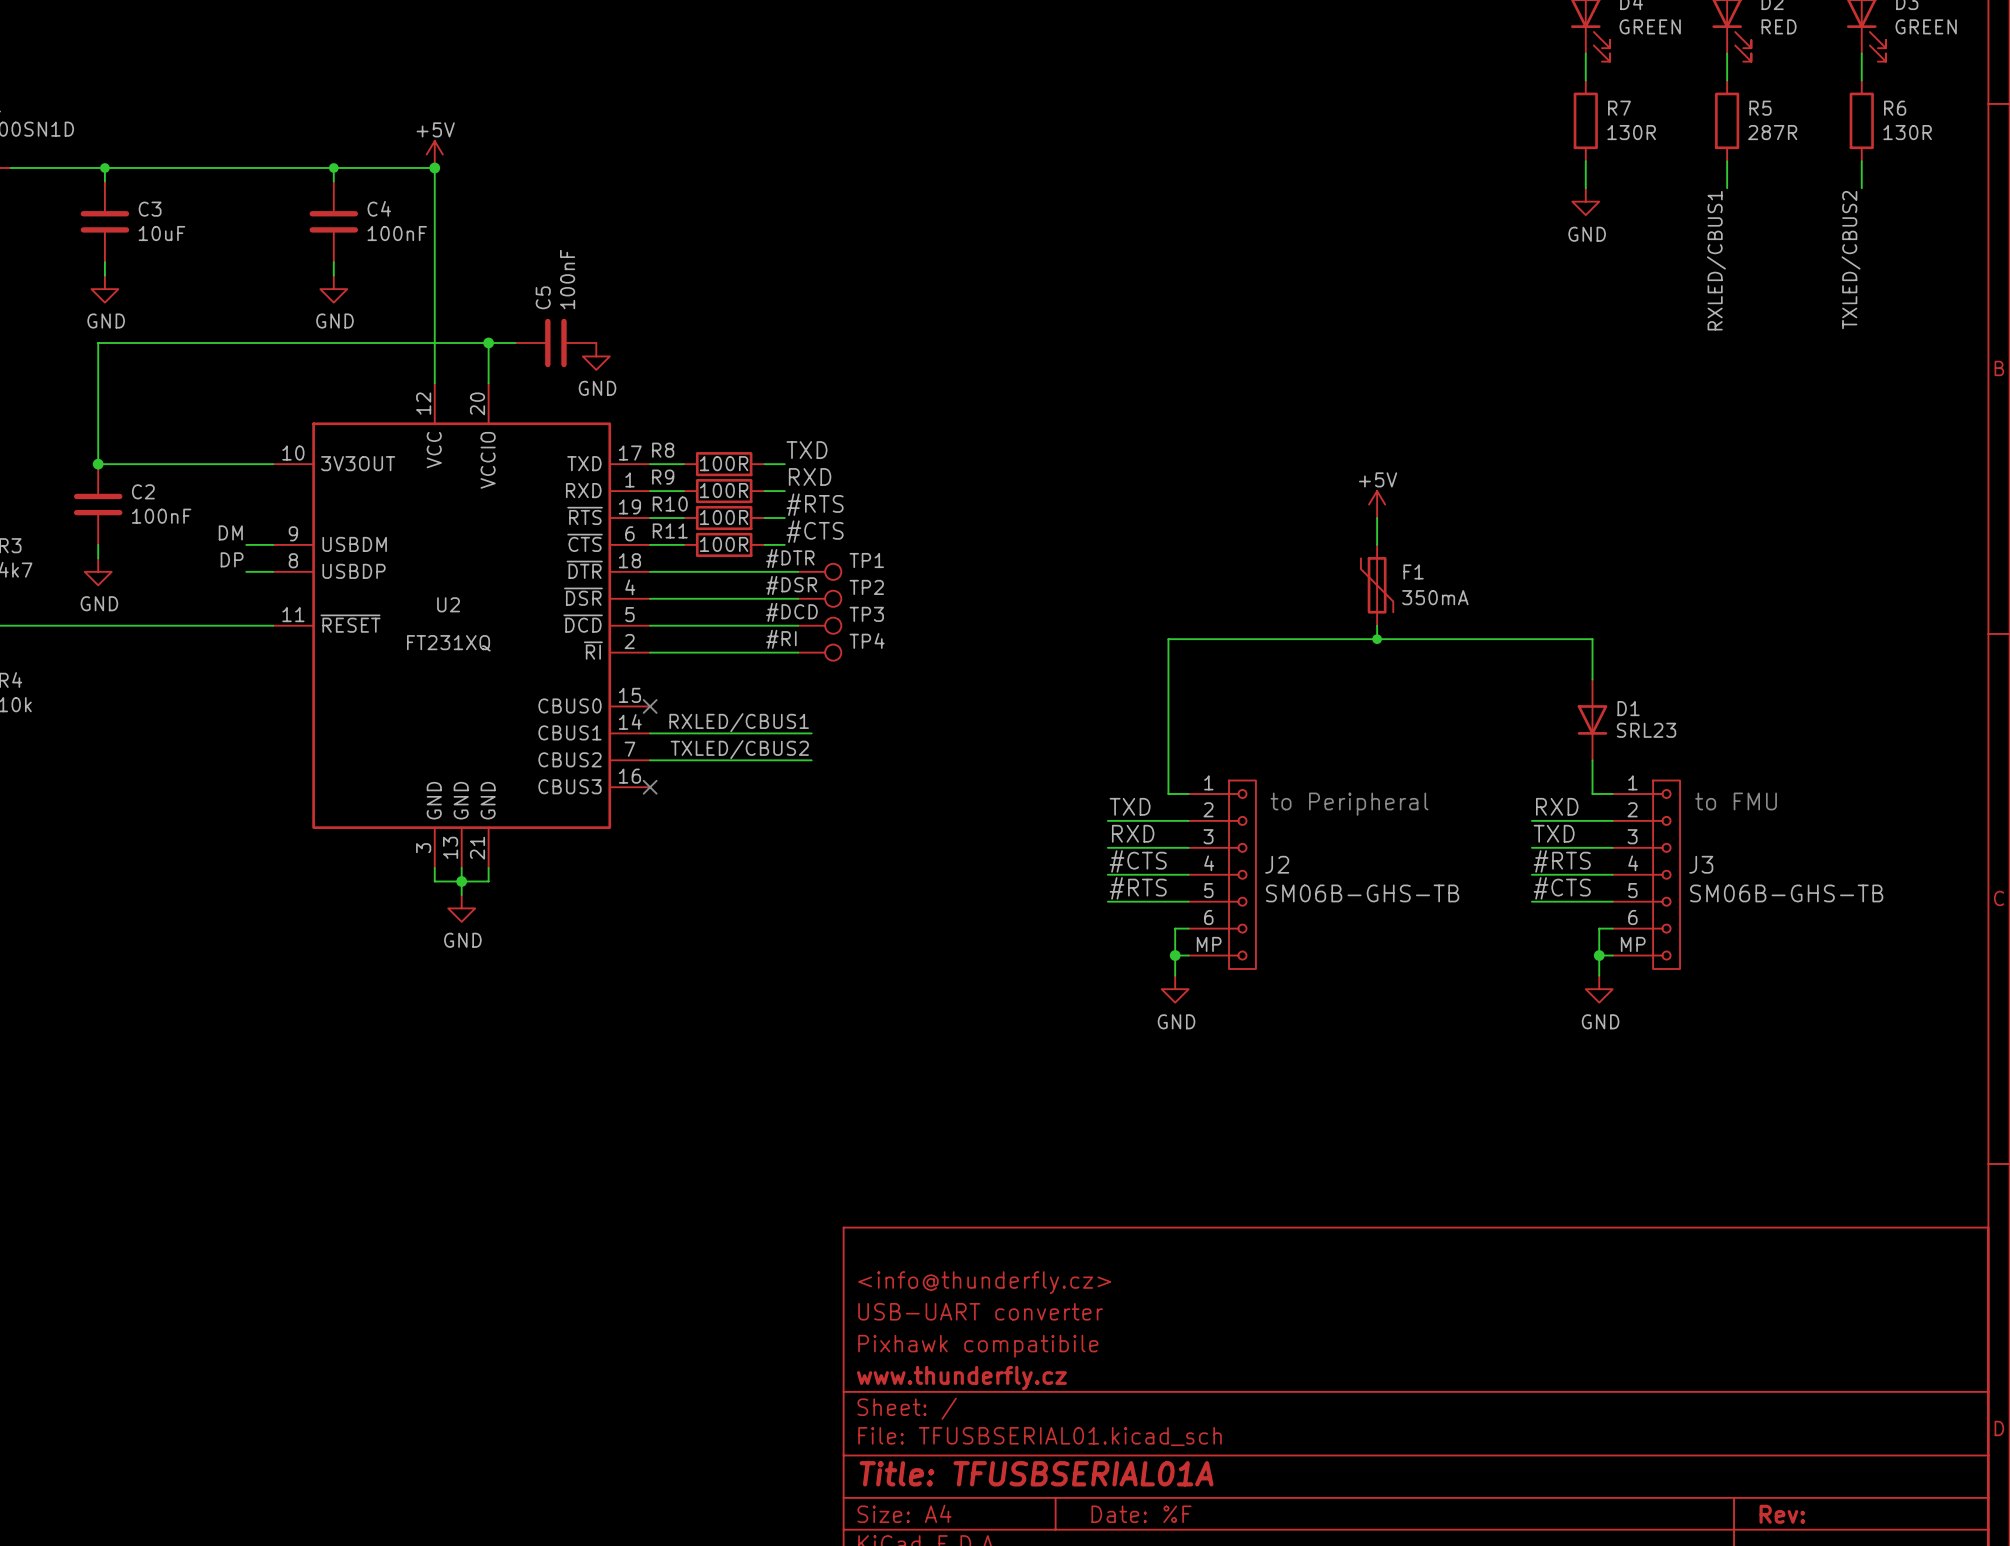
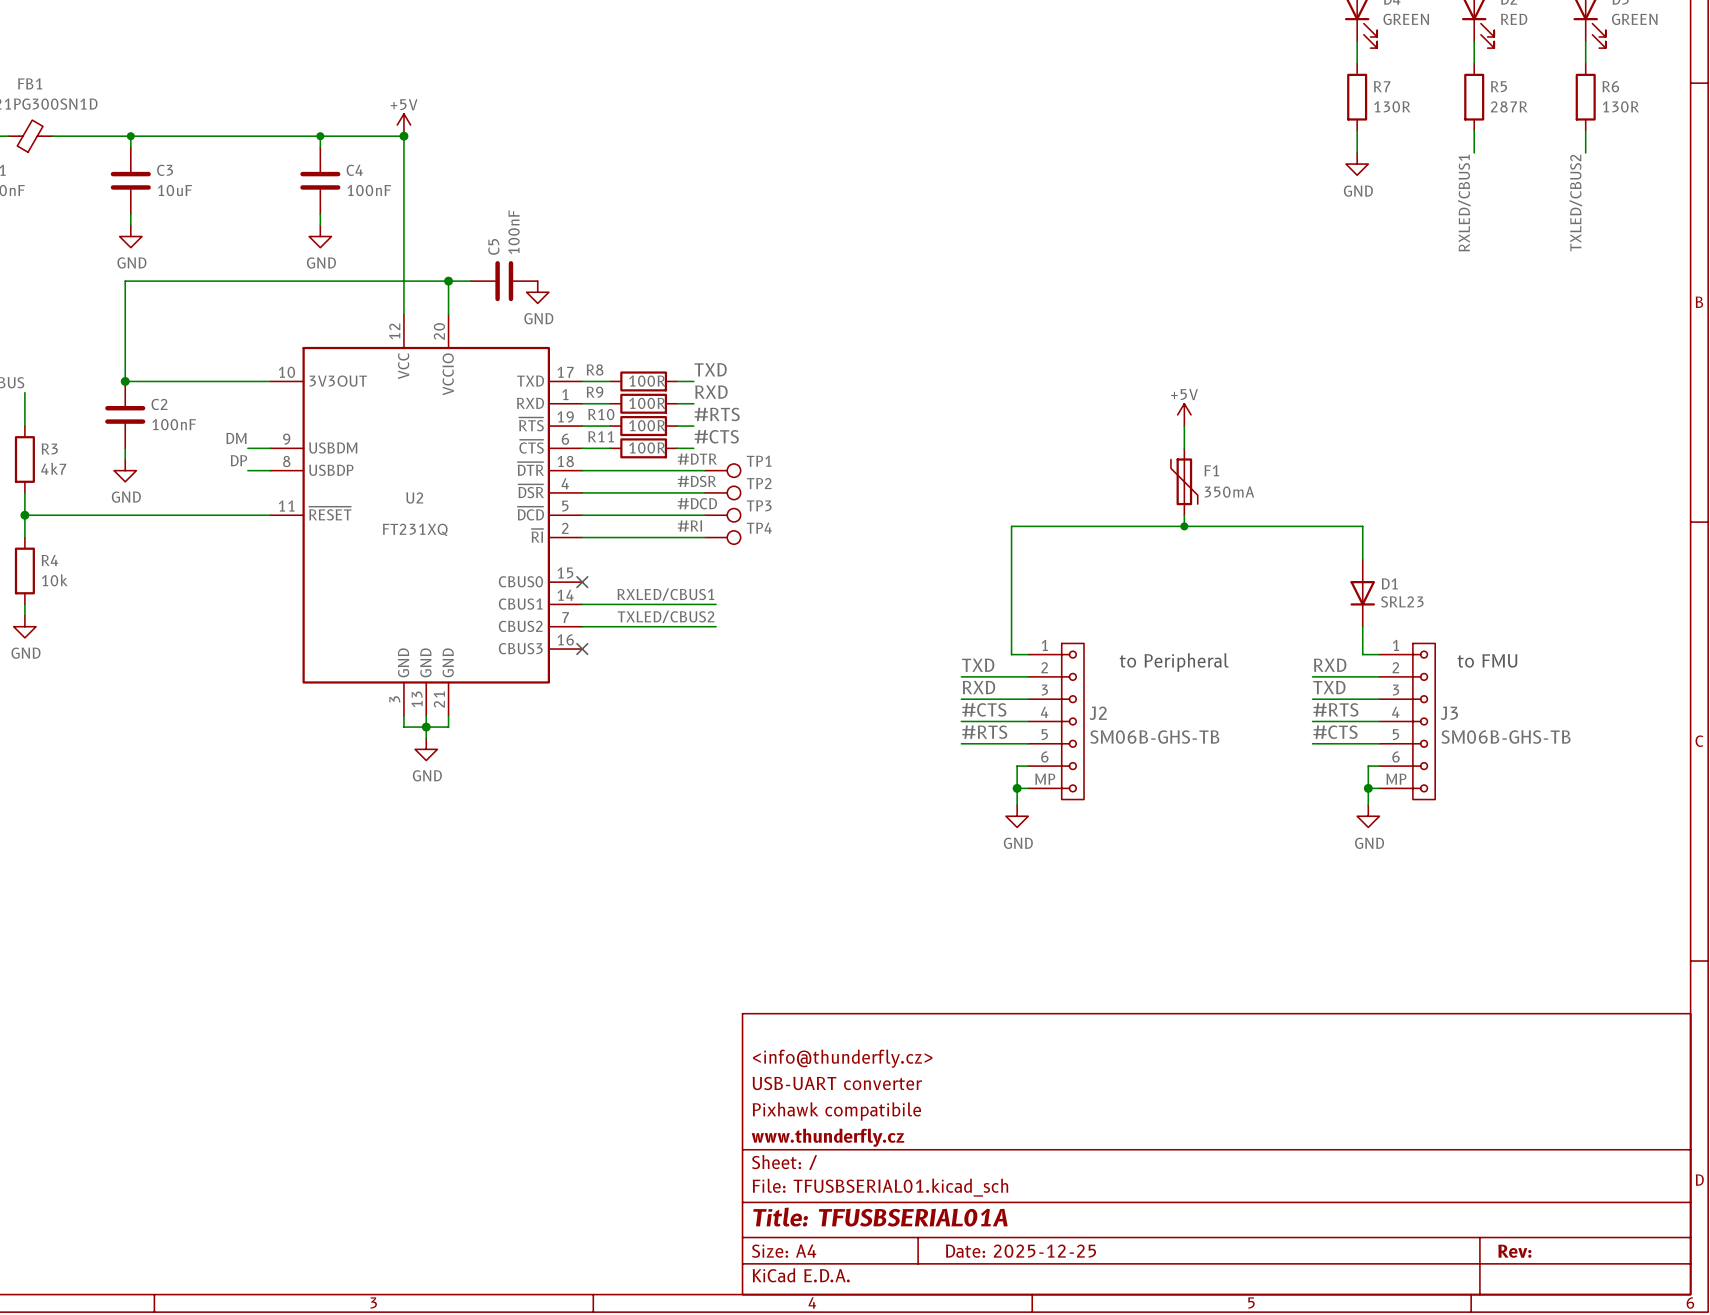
title block: Date: %F (1141, 1514) -> Date: 2025-12-25 (1020, 1251)

